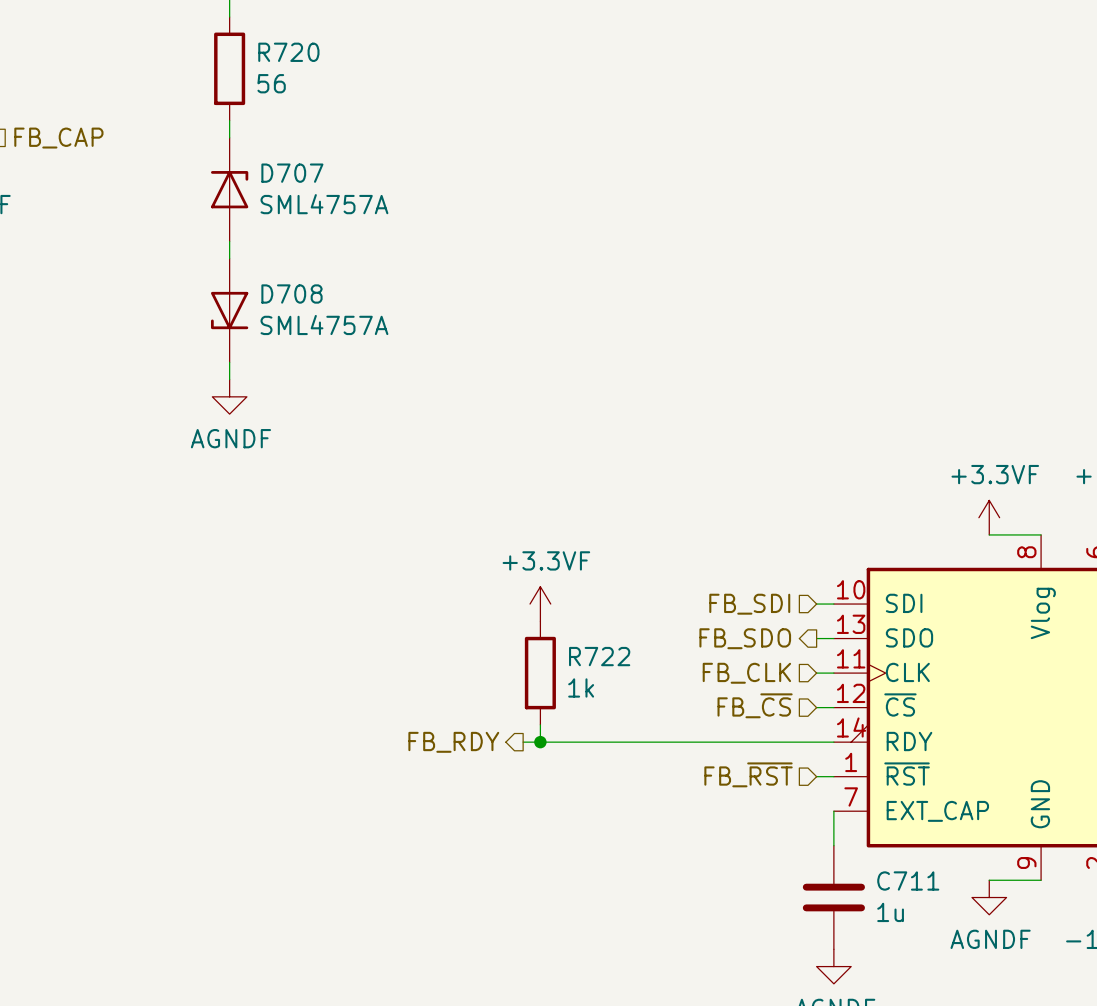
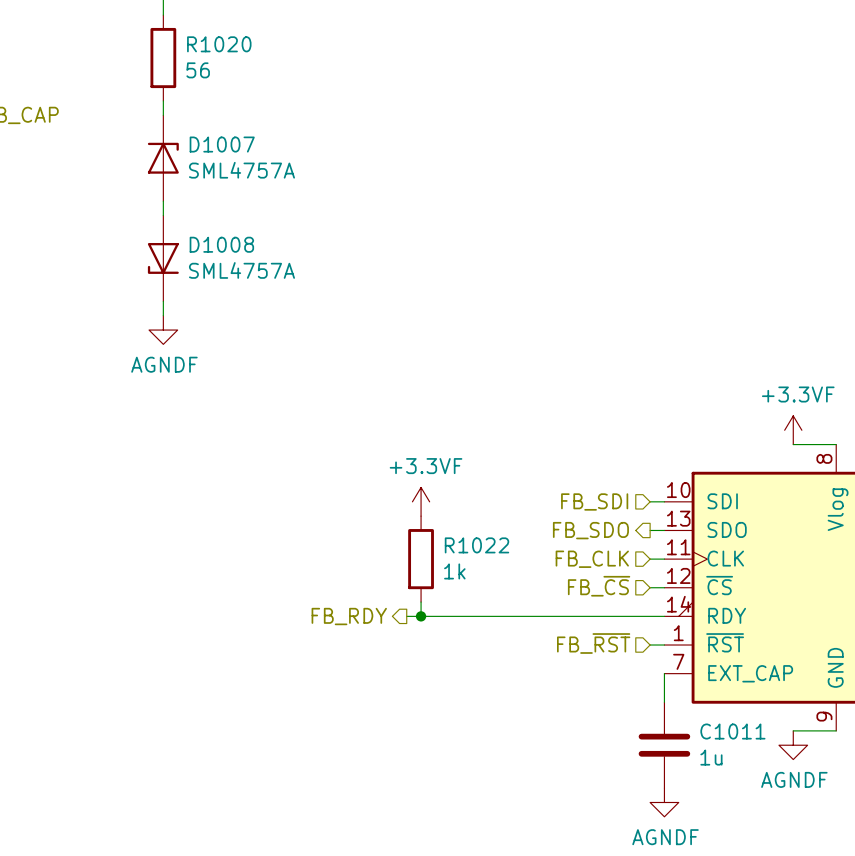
R720 name: R720 (288, 52) -> R1020 (219, 44)
D707 name: D707 (292, 173) -> D1007 (222, 144)
D708 name: D708 (291, 294) -> D1008 (221, 244)
R722 name: R722 (599, 656) -> R1022 (476, 545)
C711 name: C711 (908, 880) -> C1011 (732, 731)

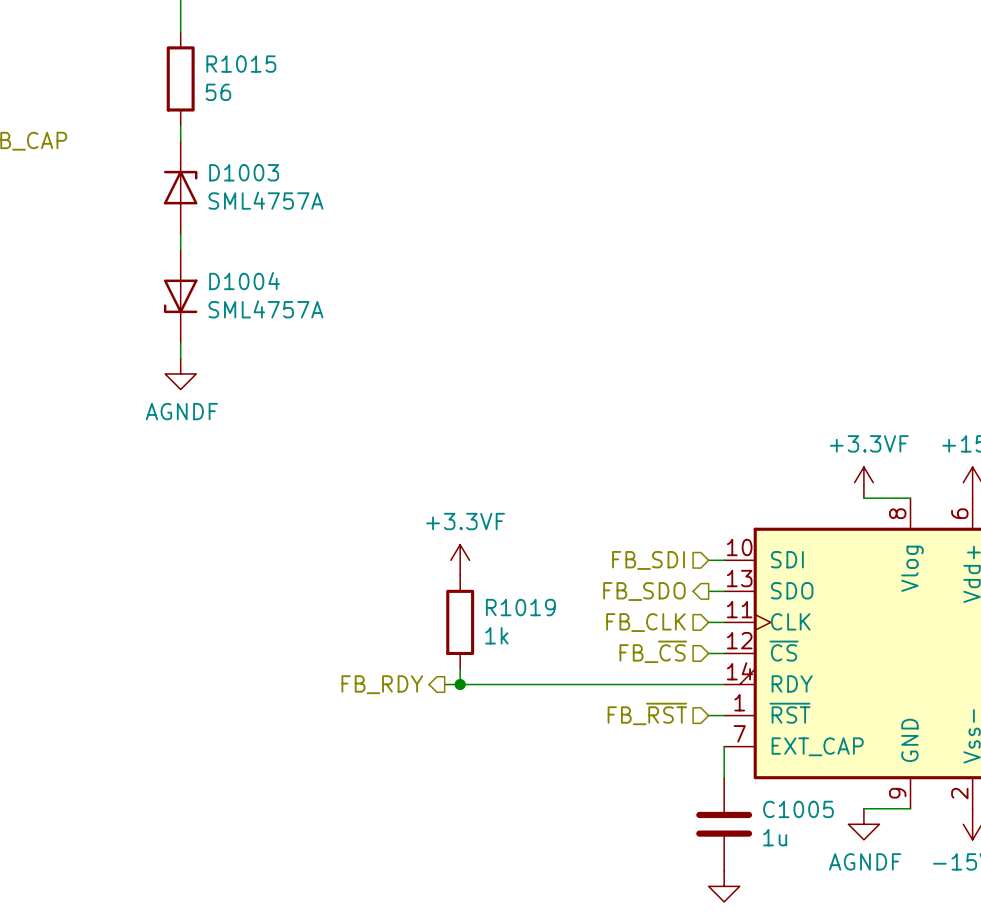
R1020 name: R1020 (219, 44) -> R1015 (241, 64)
D1007 name: D1007 (222, 144) -> D1003 (244, 172)
D1008 name: D1008 (221, 244) -> D1004 (244, 281)
R1022 name: R1022 (476, 545) -> R1019 (520, 607)
C1011 name: C1011 (732, 731) -> C1005 (798, 809)

